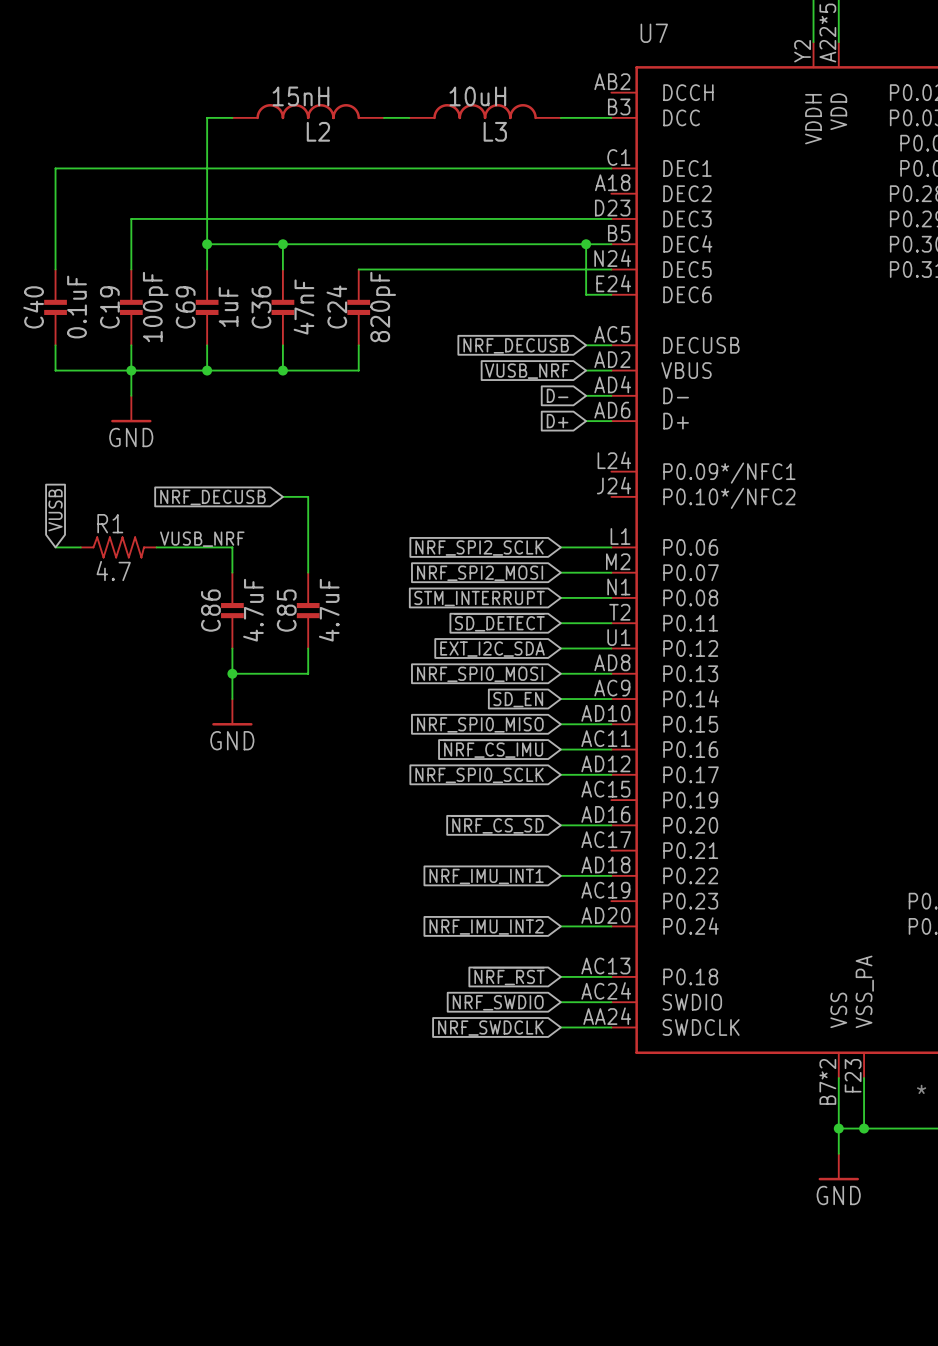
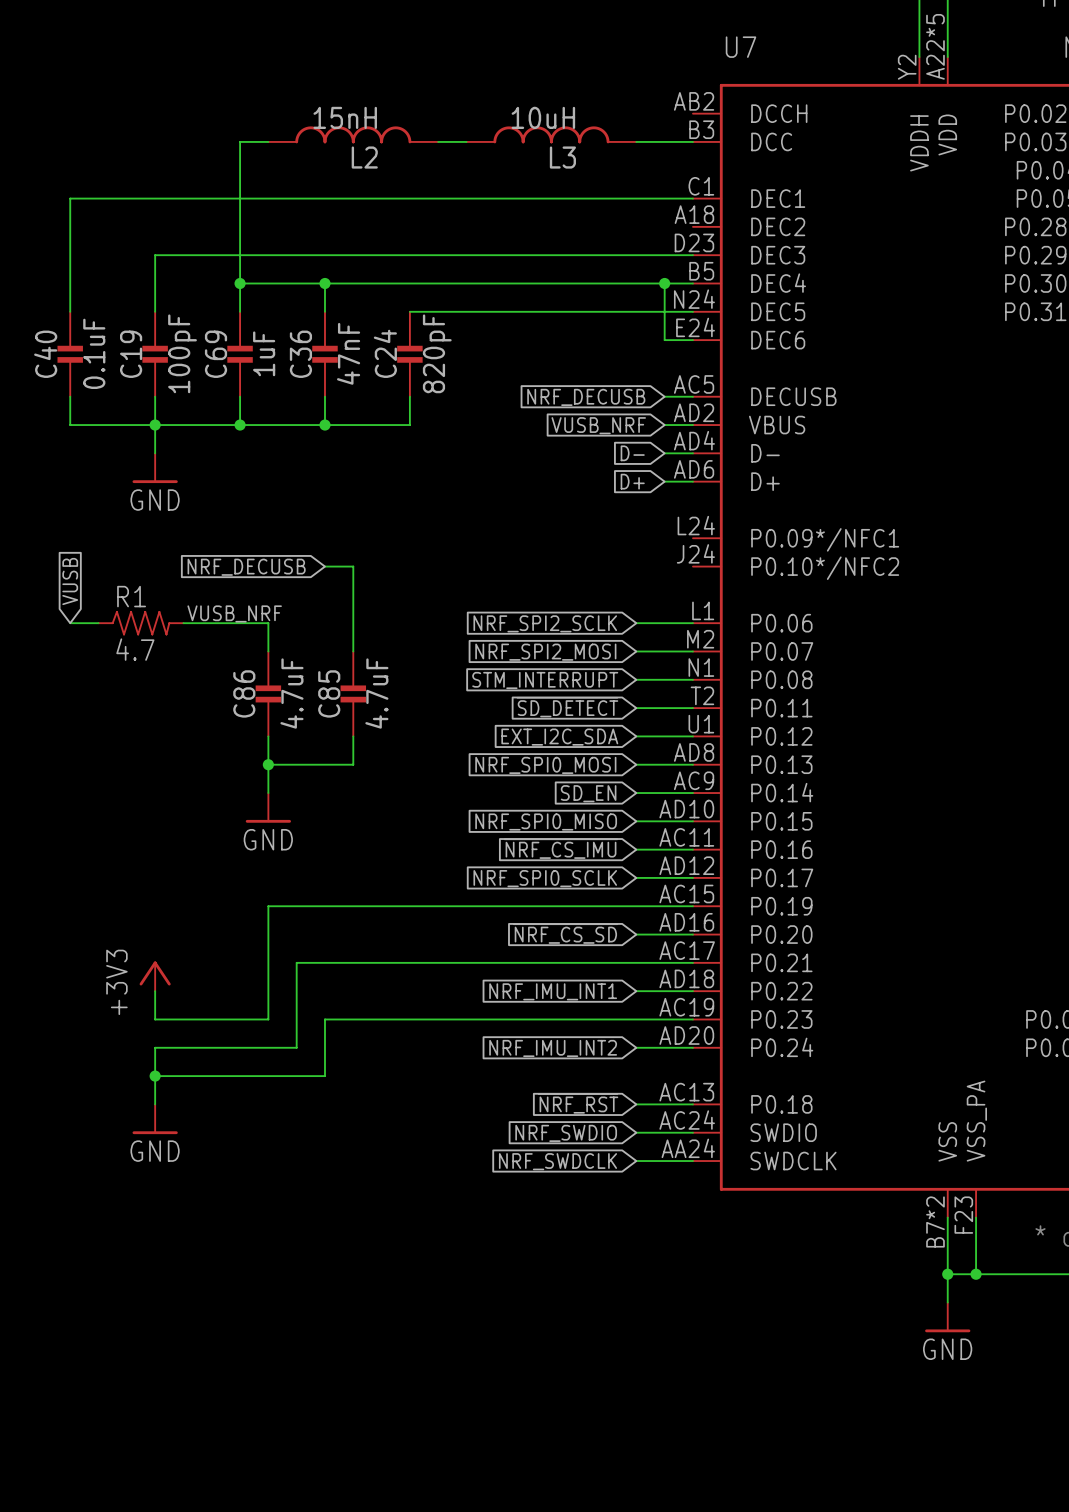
wire: none -> (692, 906) (268, 906) (268, 1019) (155, 1019) (155, 991)
wire: none -> (692, 962) (296, 962) (296, 1047) (155, 1047) (155, 1104)
power symbol: none -> +3V3 (155, 976)
wire: none -> (692, 1019) (324, 1019) (324, 1076) (155, 1076)
junction: none -> (155, 1076)
power symbol: none -> GND (155, 1119)

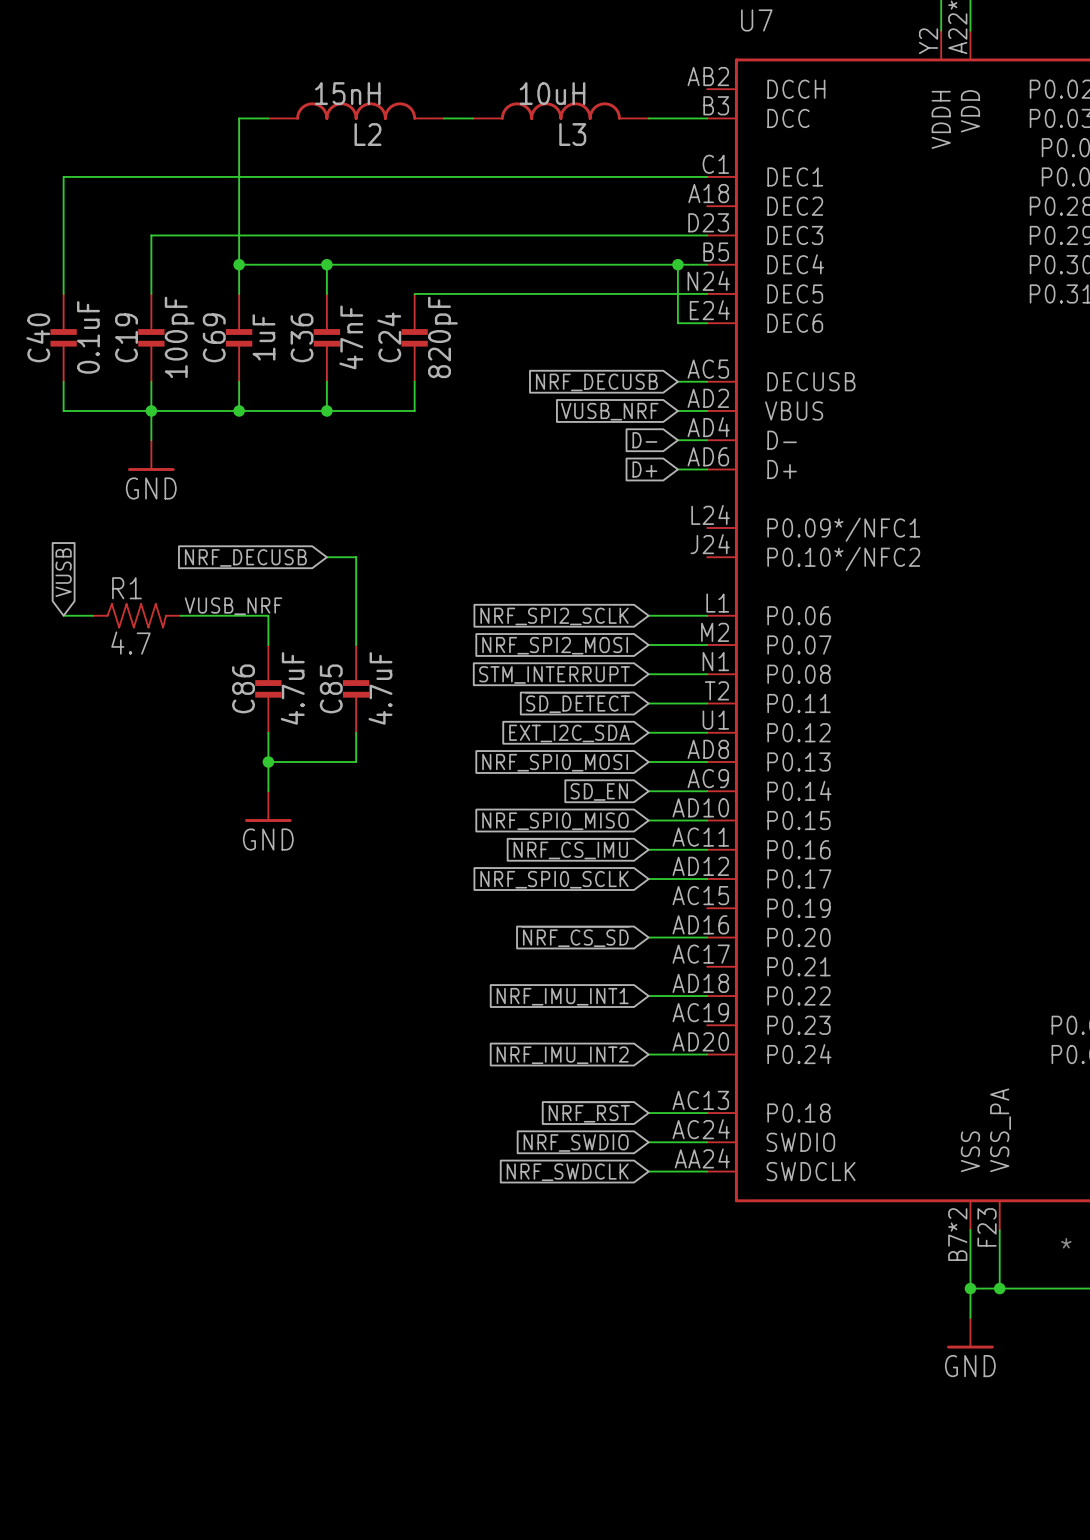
wire: (692, 906) (268, 906) (268, 1019) (155, 1019) (155, 991) -> none
wire: (692, 962) (296, 962) (296, 1047) (155, 1047) (155, 1104) -> none
power symbol: +3V3 (155, 976) -> none
wire: (692, 1019) (324, 1019) (324, 1076) (155, 1076) -> none
junction: (155, 1076) -> none
power symbol: GND (155, 1119) -> none

